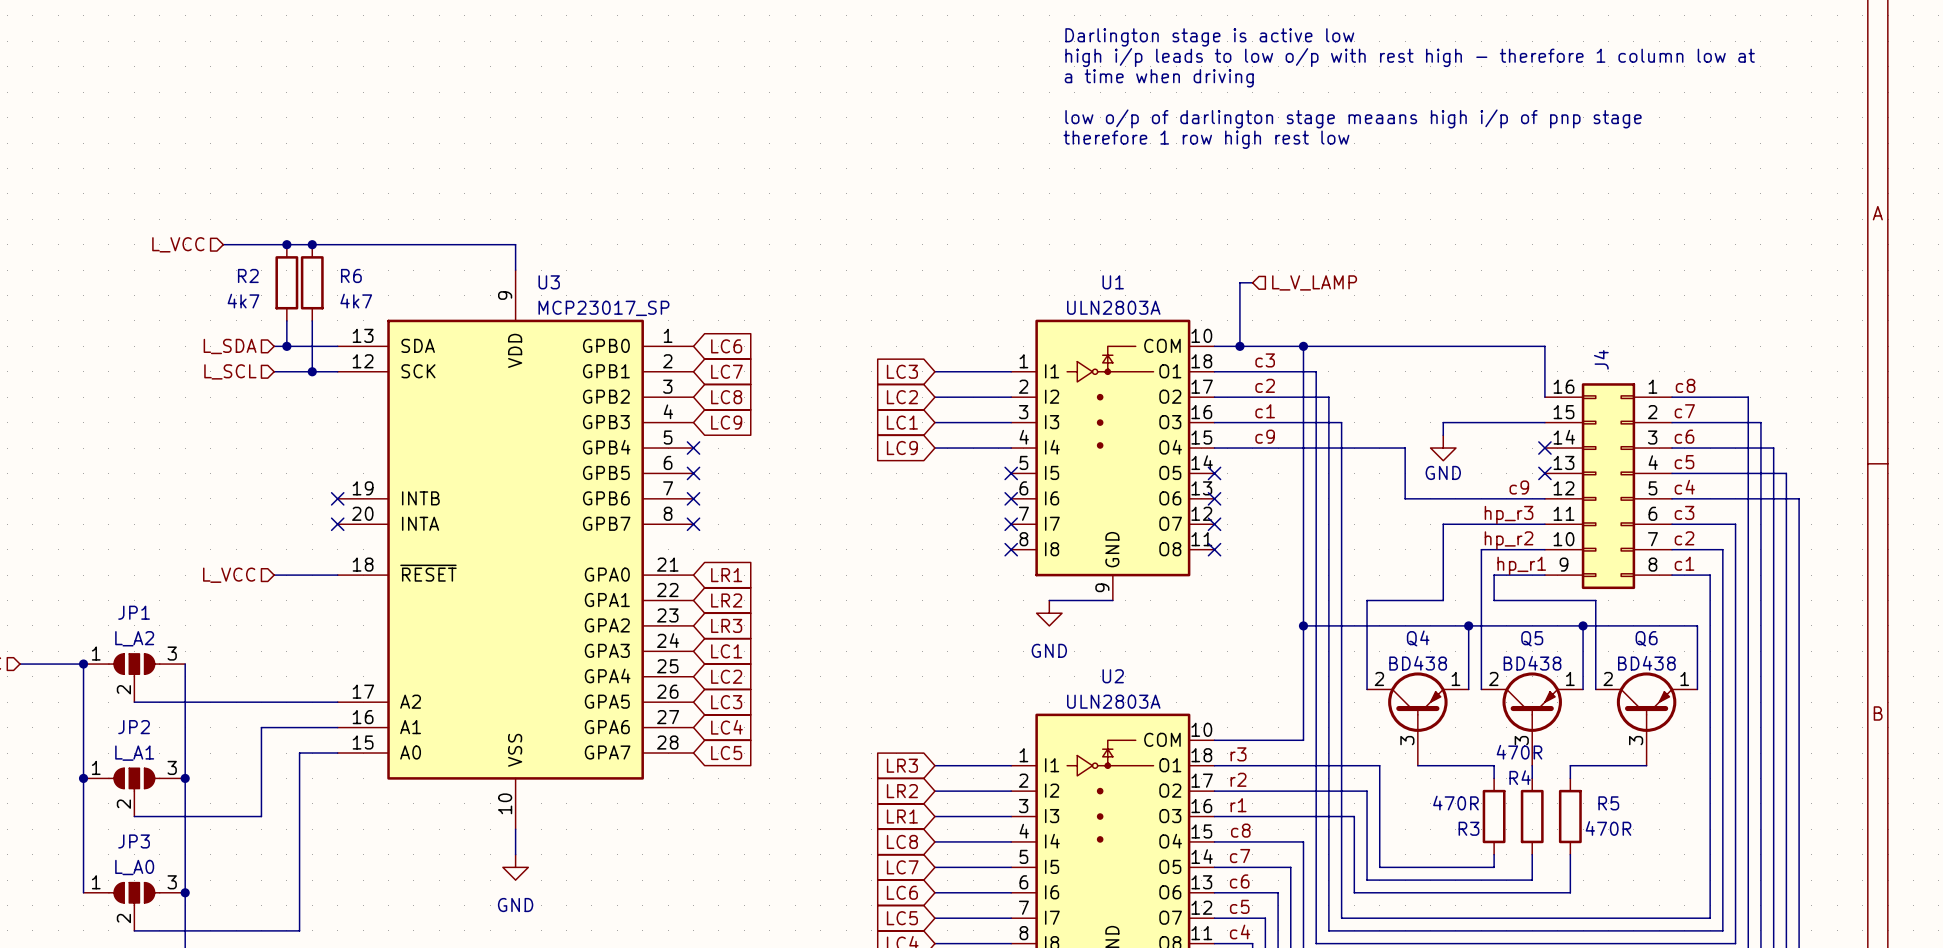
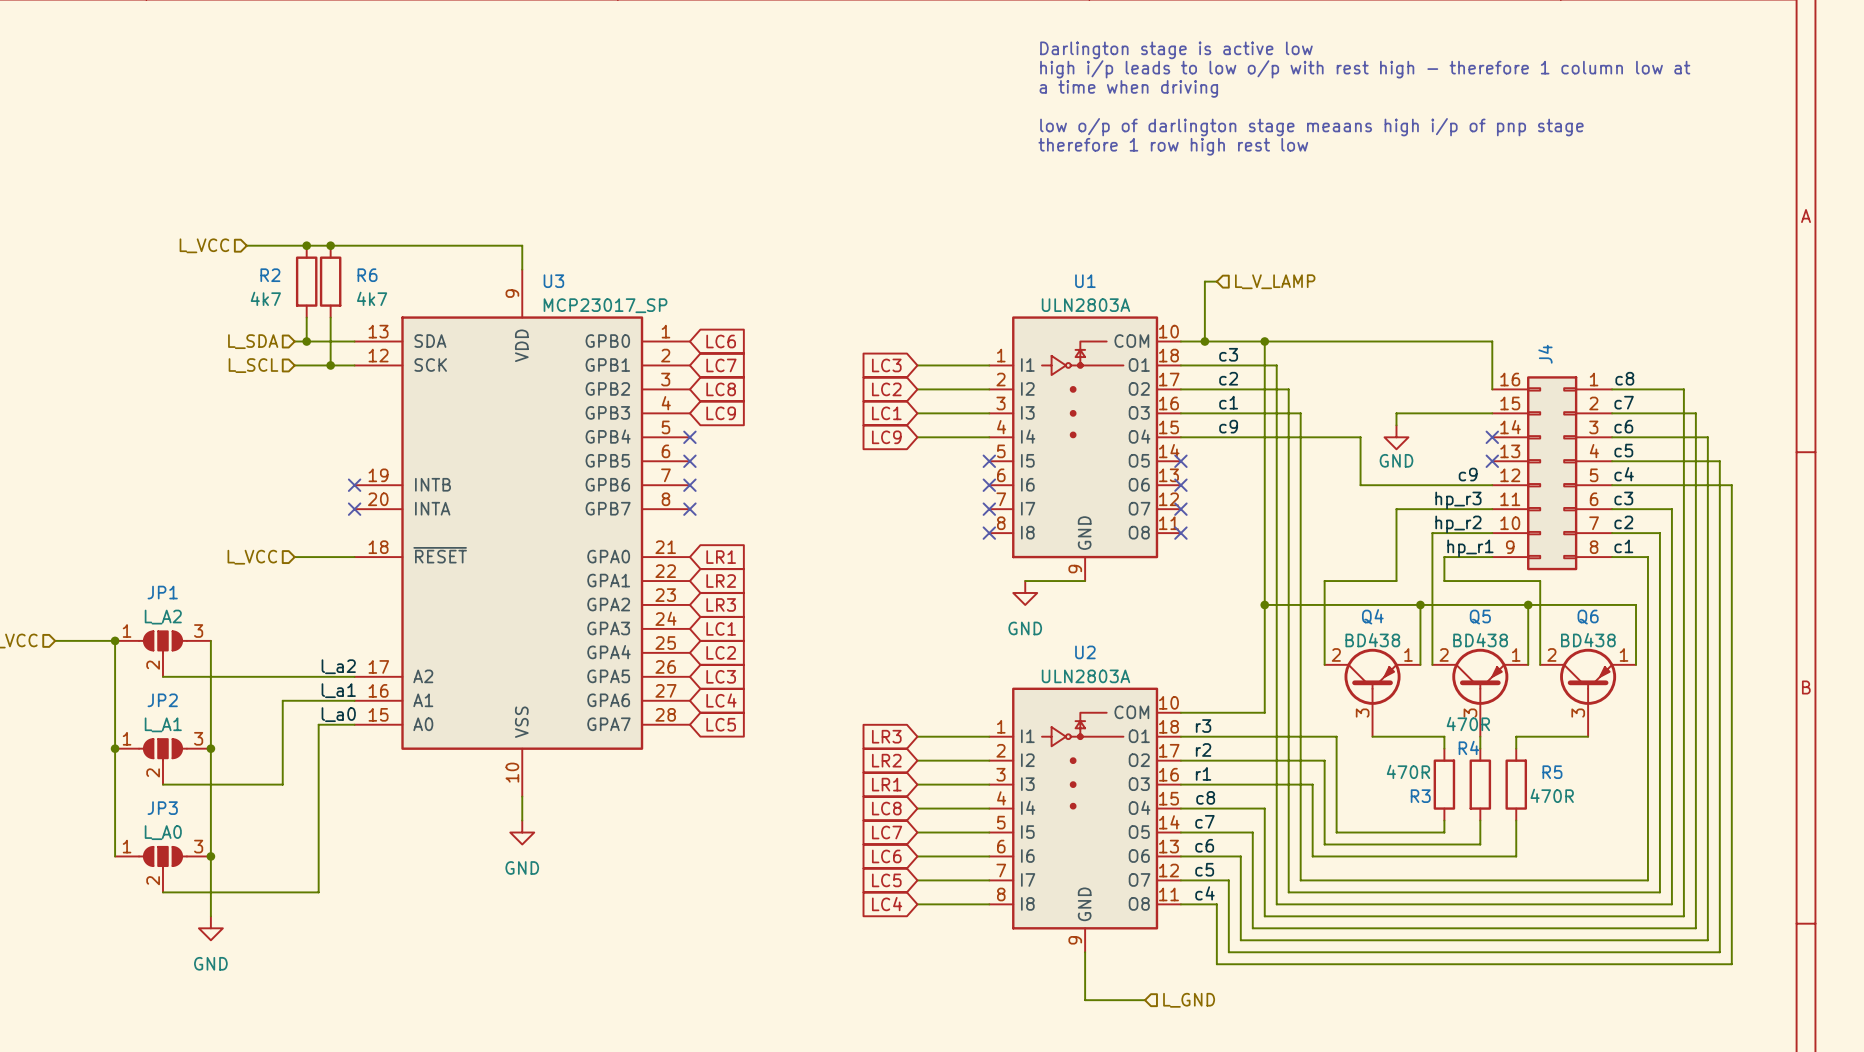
label: none -> l_a2 (338, 666)
label: none -> l_a1 (338, 690)
label: none -> l_a0 (338, 714)

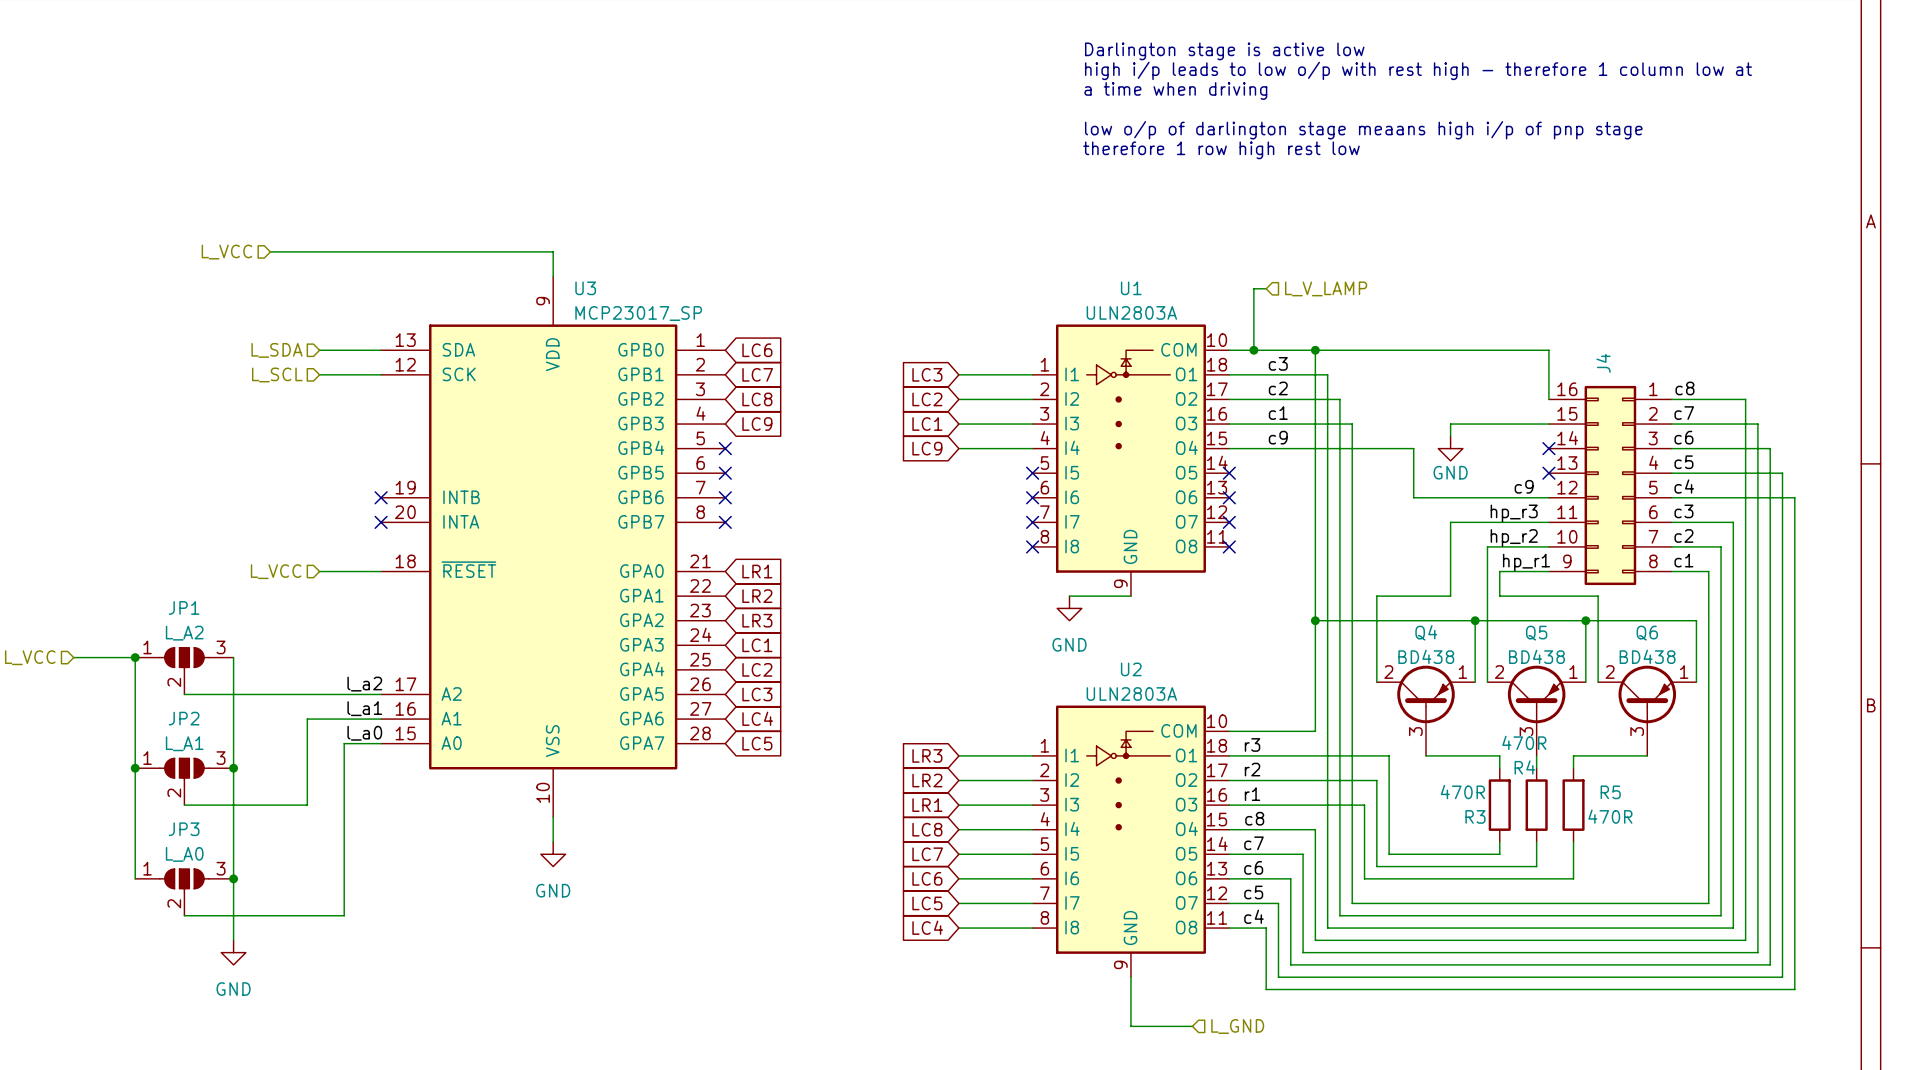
junction: (306, 245) -> none
junction: (330, 245) -> none
R2: 4k7 (306, 281) -> none
R6: 4k7 (330, 281) -> none
wire: (306, 317) (306, 341) -> none
wire: (330, 317) (330, 365) -> none
junction: (306, 341) -> none
junction: (330, 365) -> none

